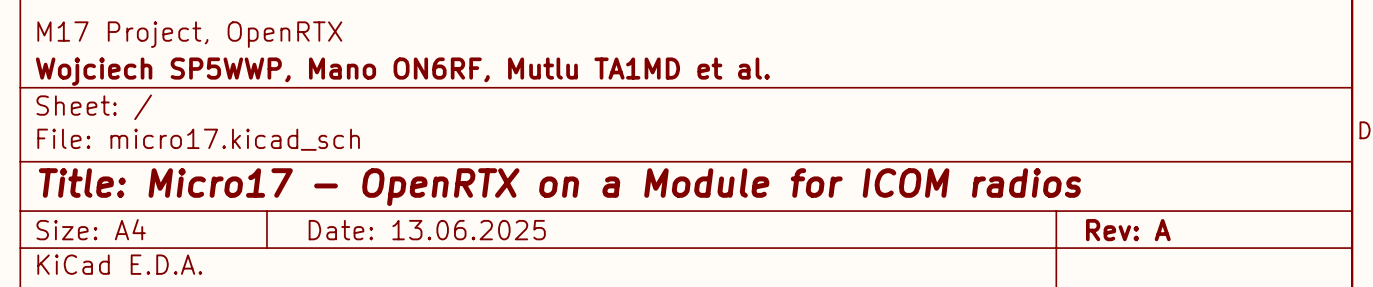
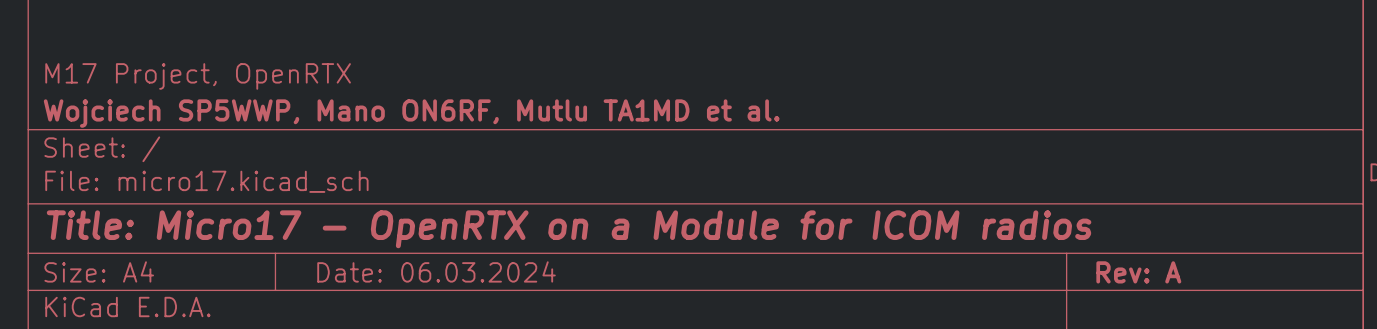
title block: Date: 13.06.2025 (427, 230) -> Date: 06.03.2024 (436, 271)

